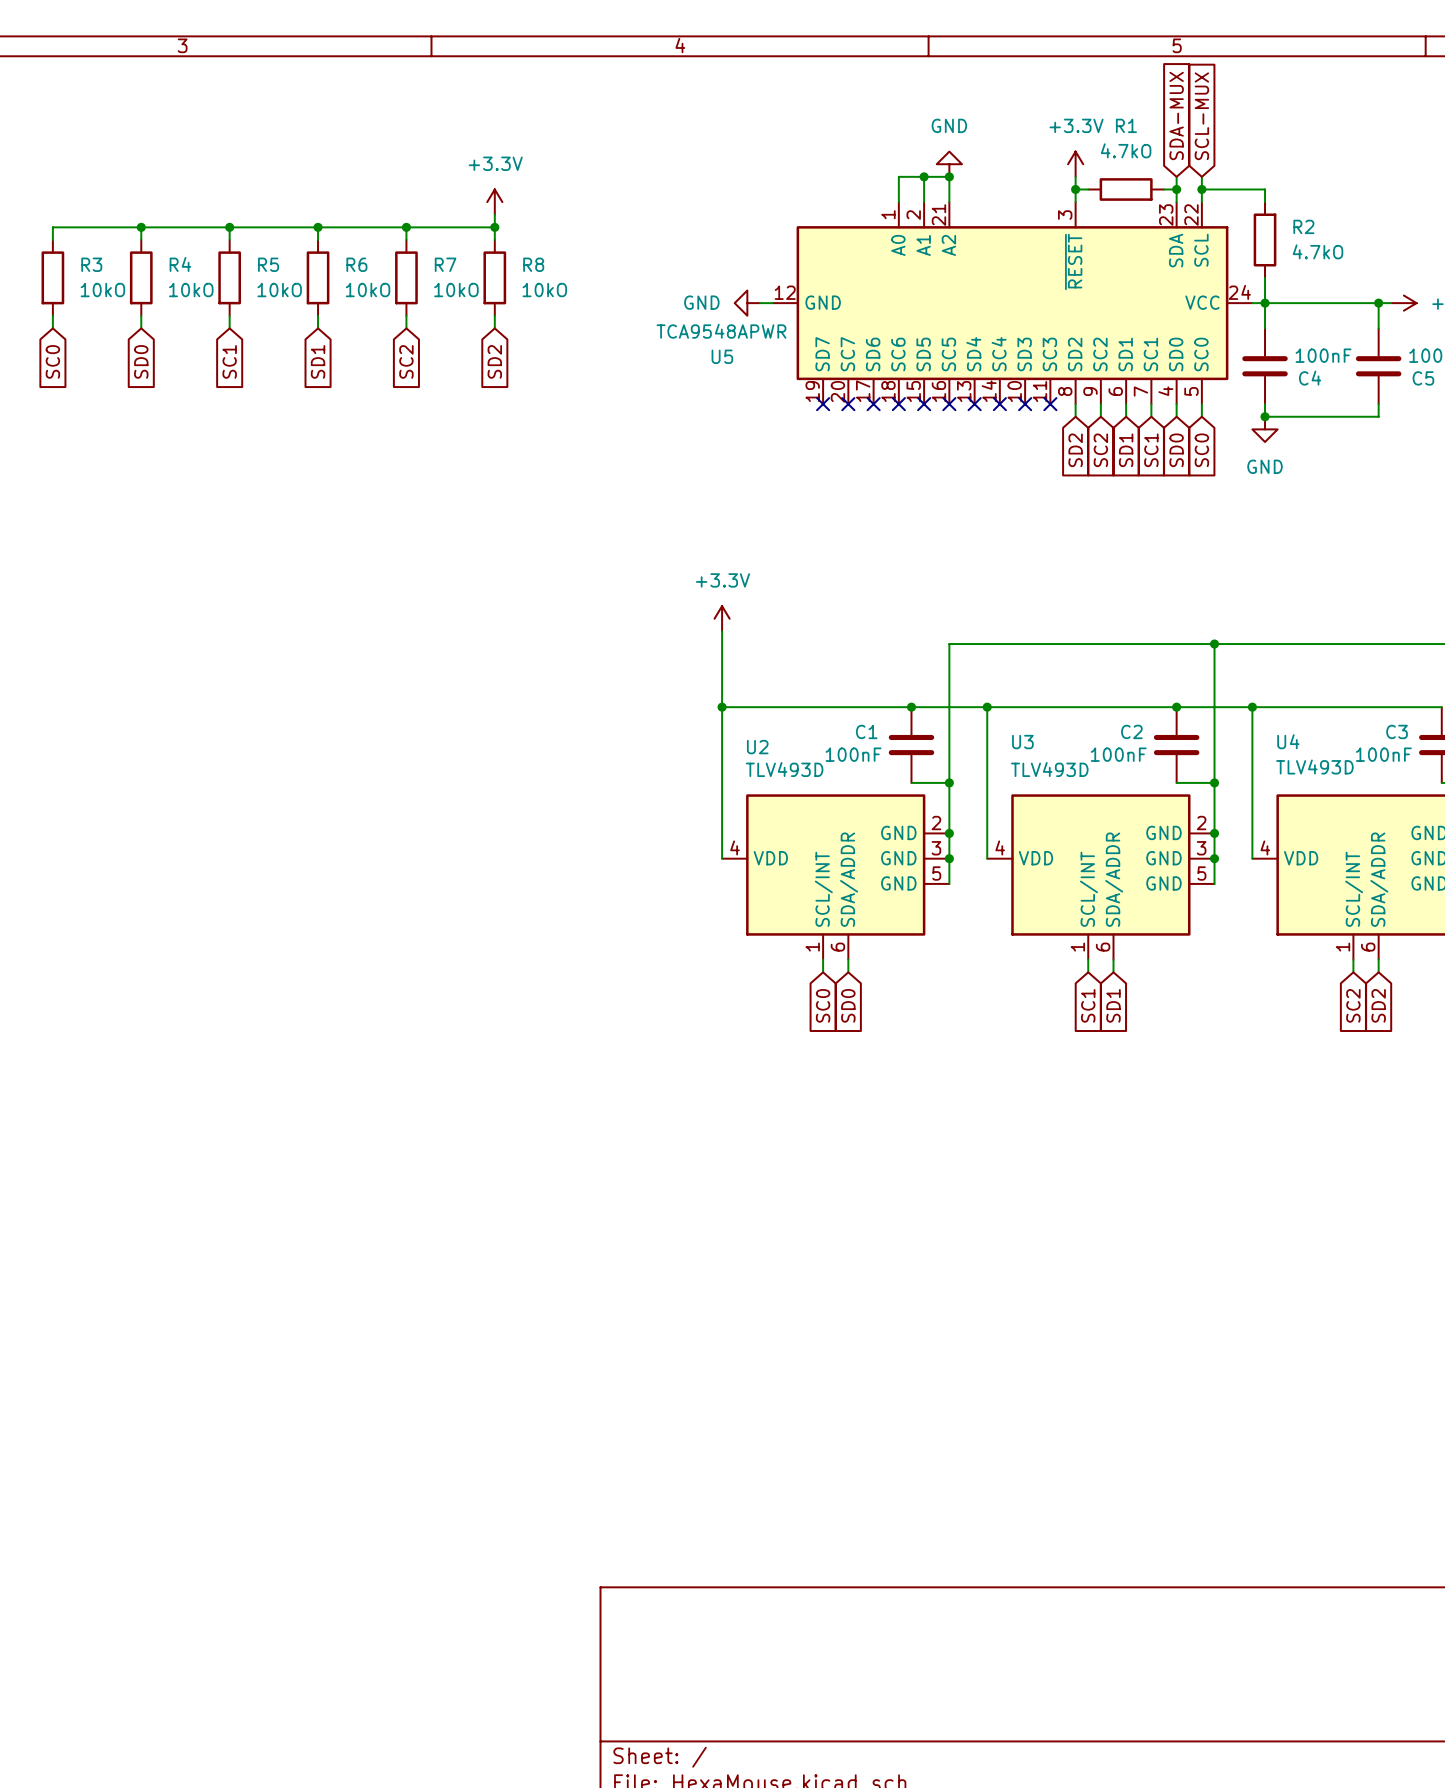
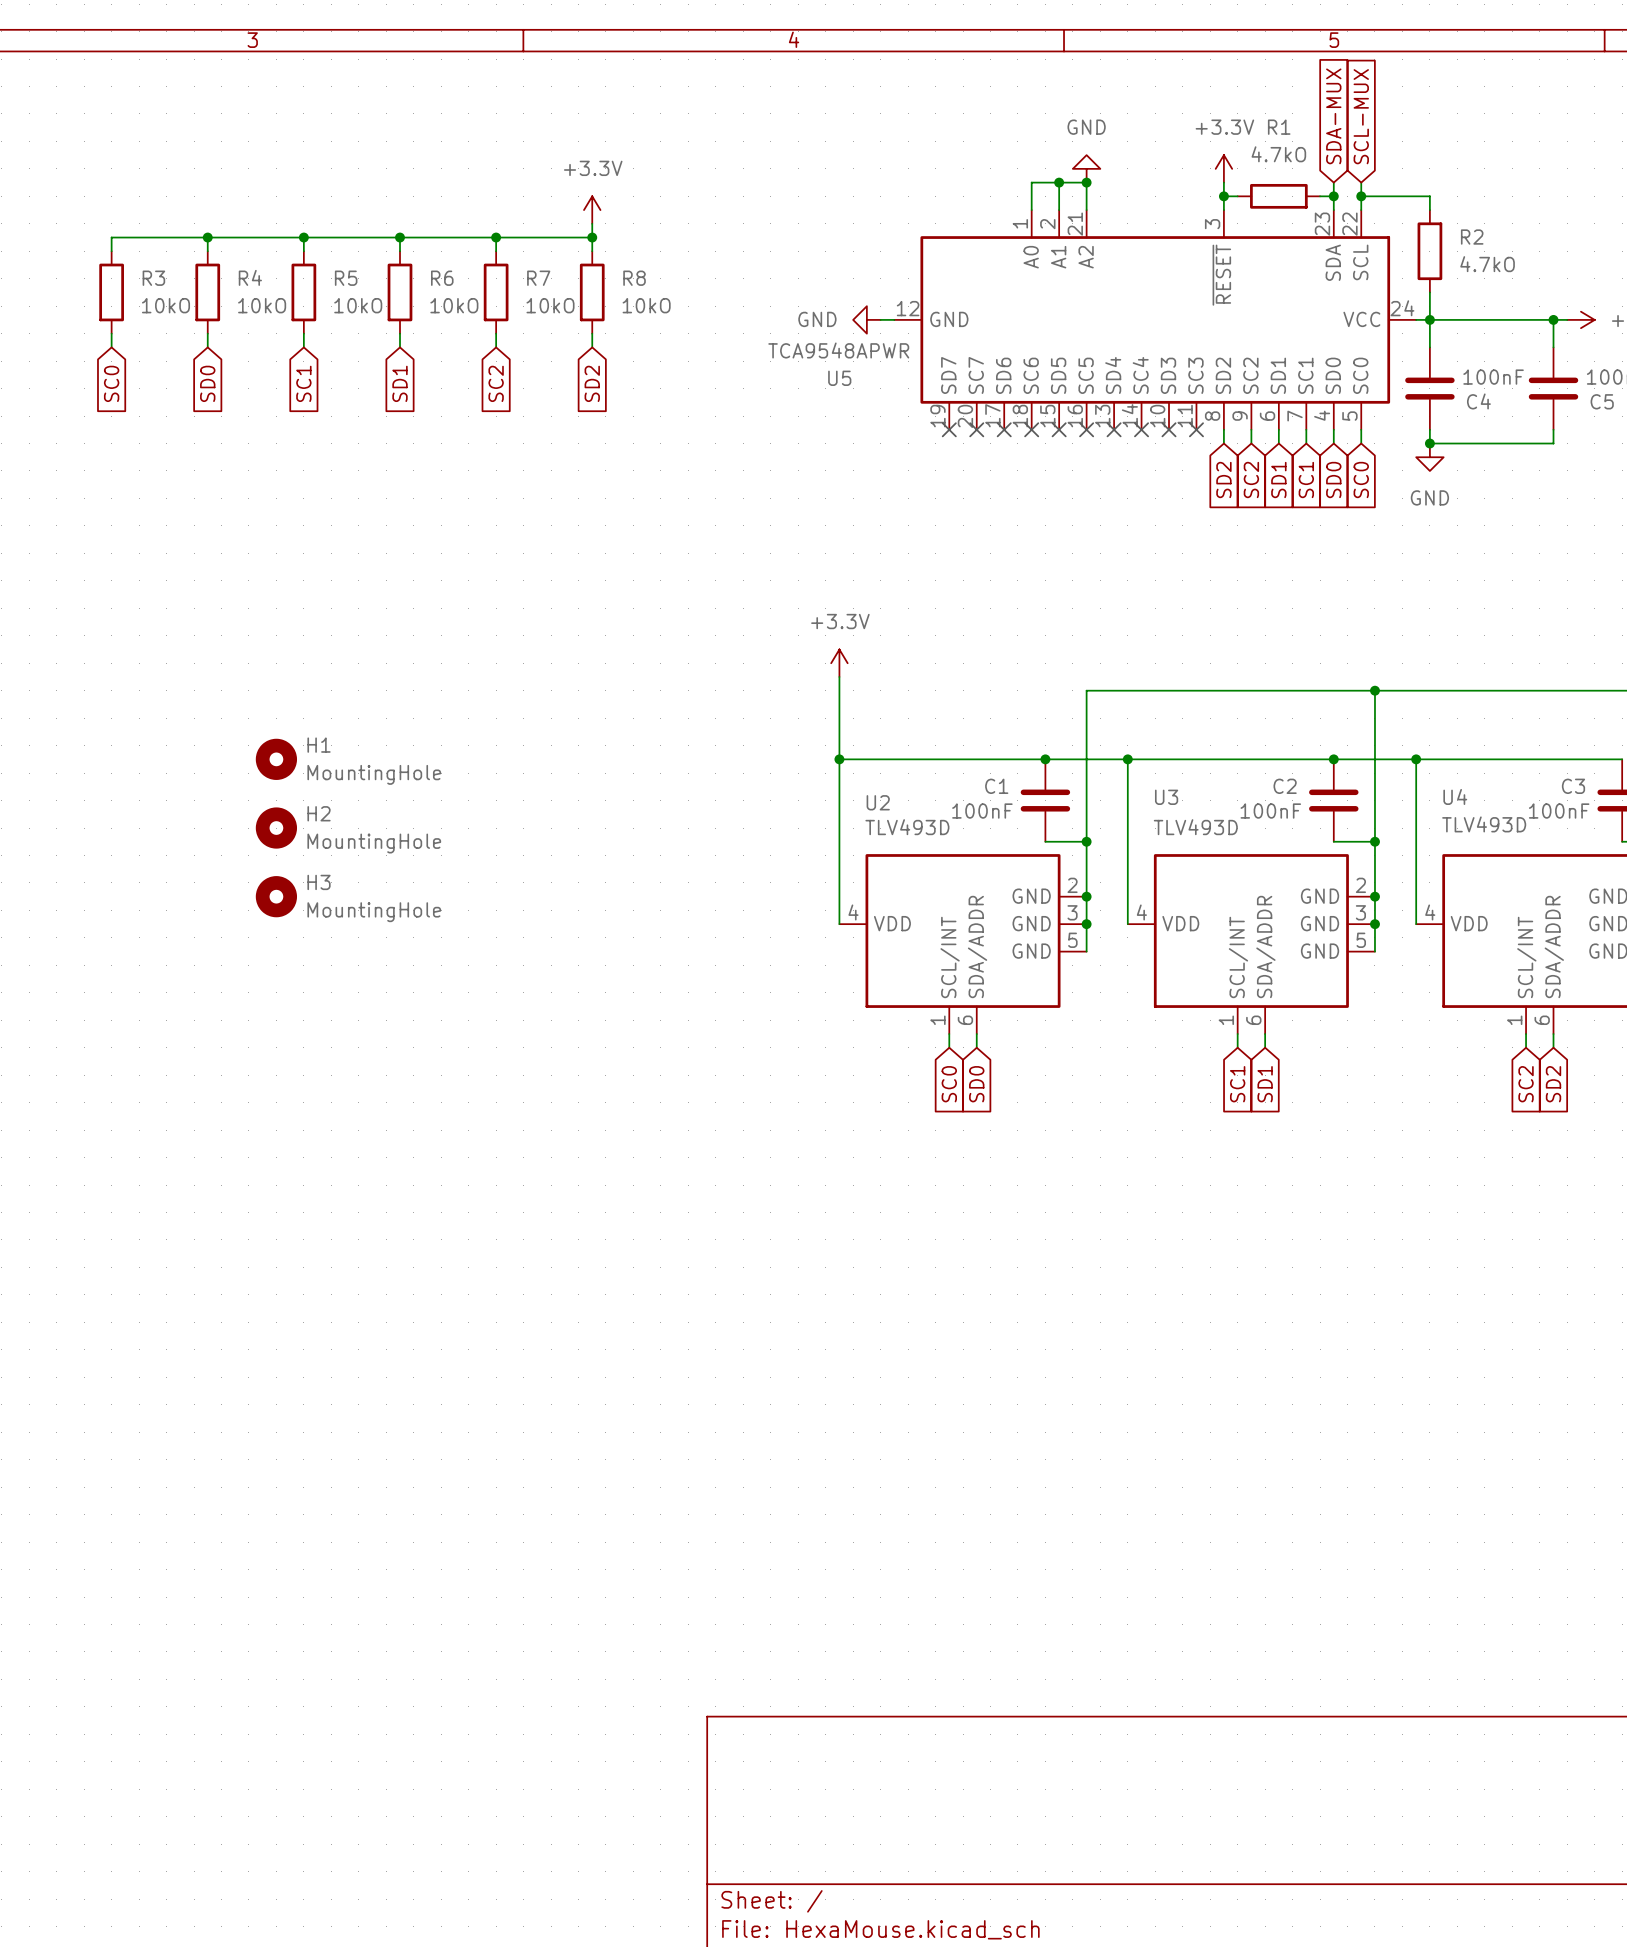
H1: none -> MountingHole (276, 759)
H2: none -> MountingHole (276, 828)
H3: none -> MountingHole (276, 896)

